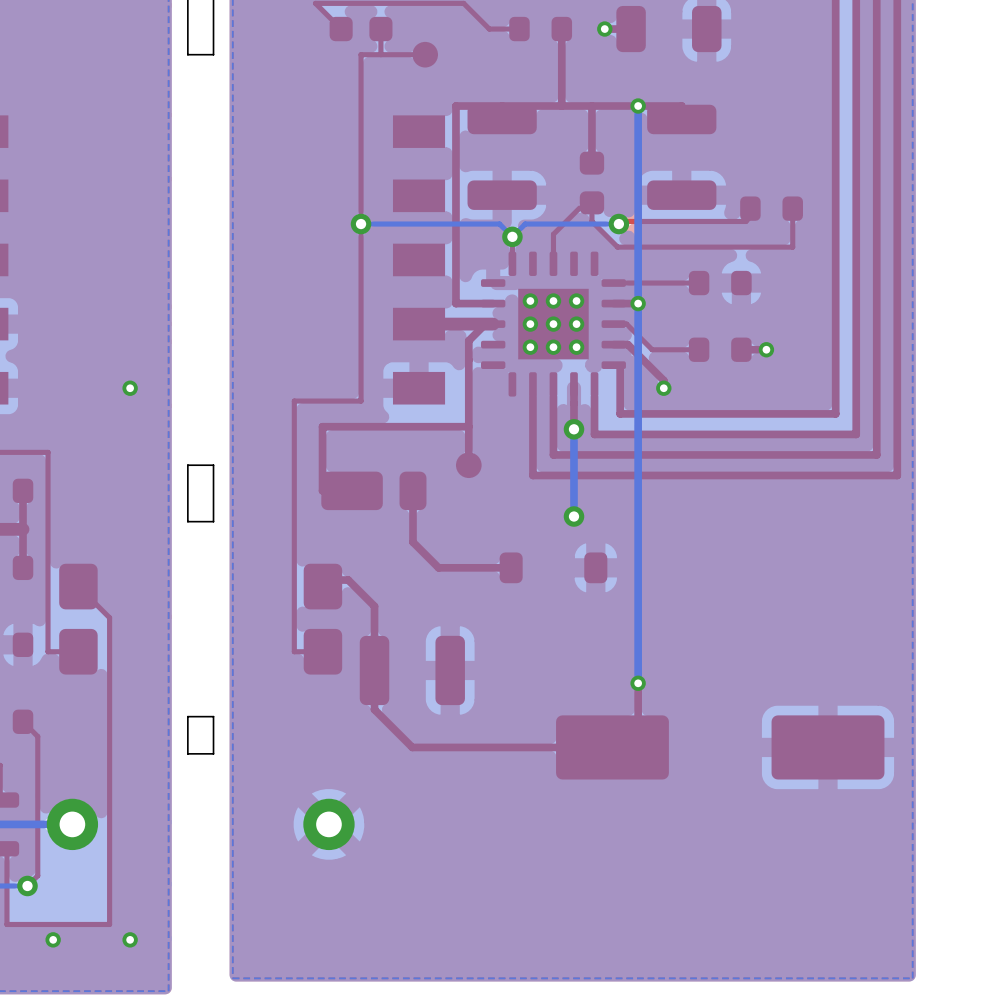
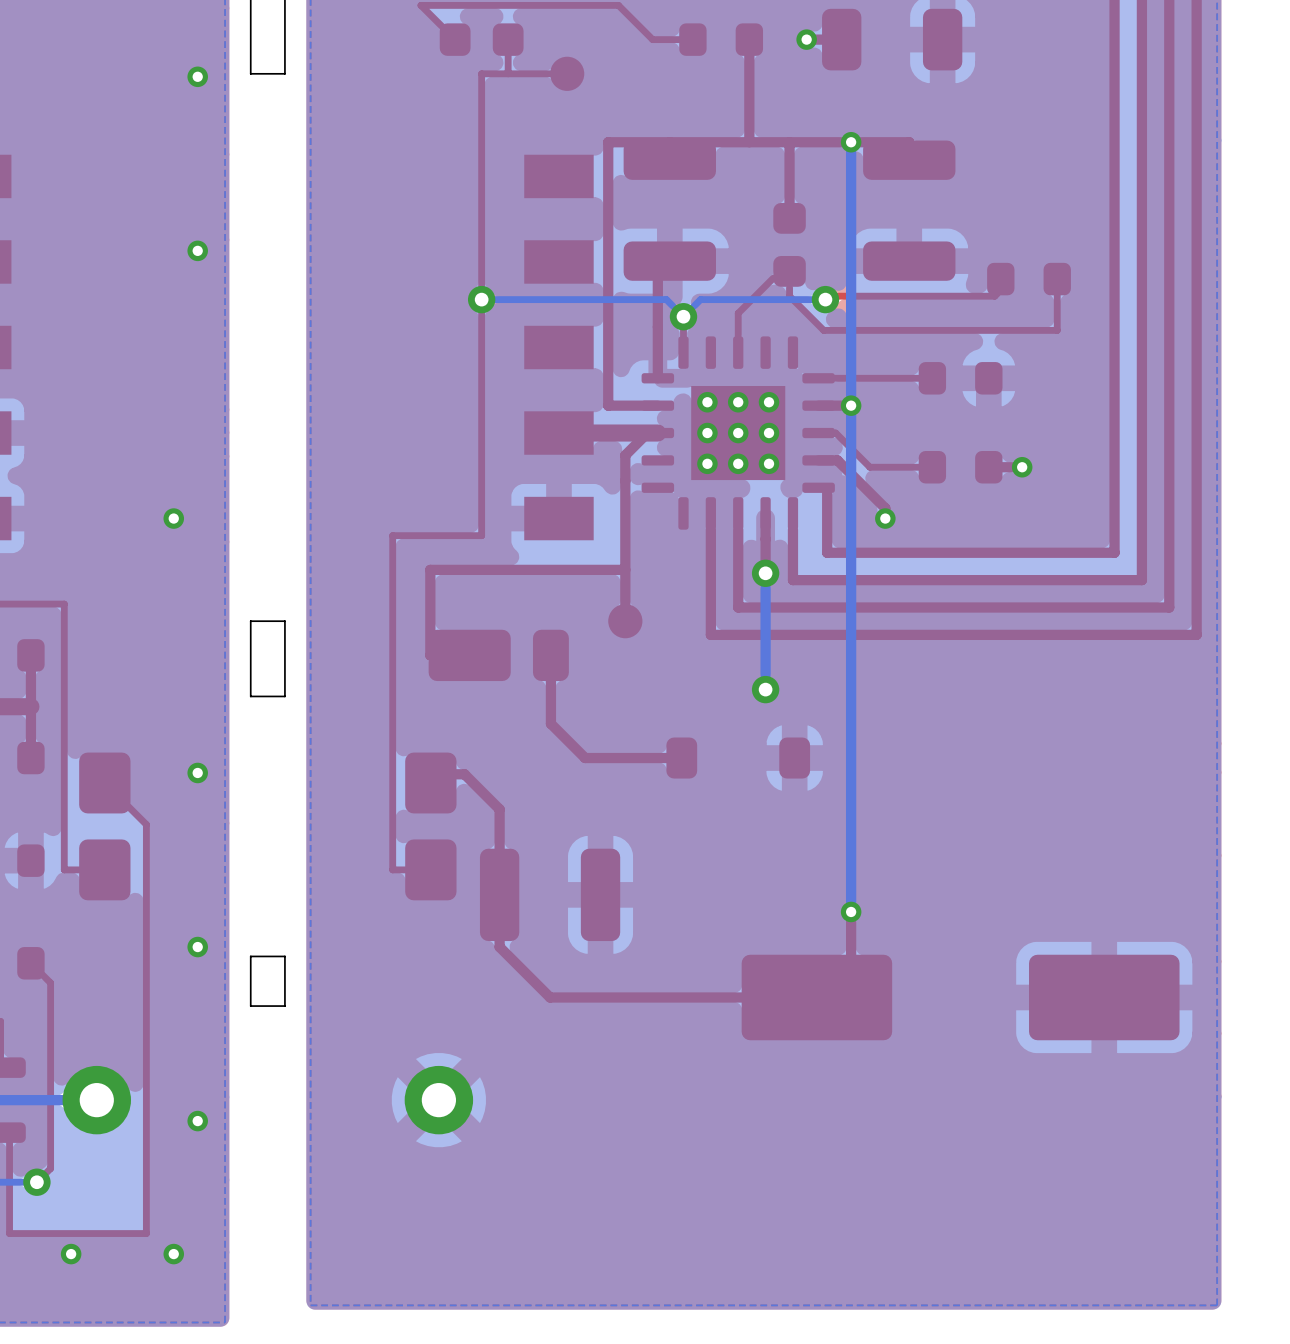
via: none -> (197, 76)
via: none -> (197, 250)
top track: none -> (669, 261) (657, 261) (657, 378)
via: none -> (197, 772)
via: none -> (197, 947)
via: none -> (197, 1121)

